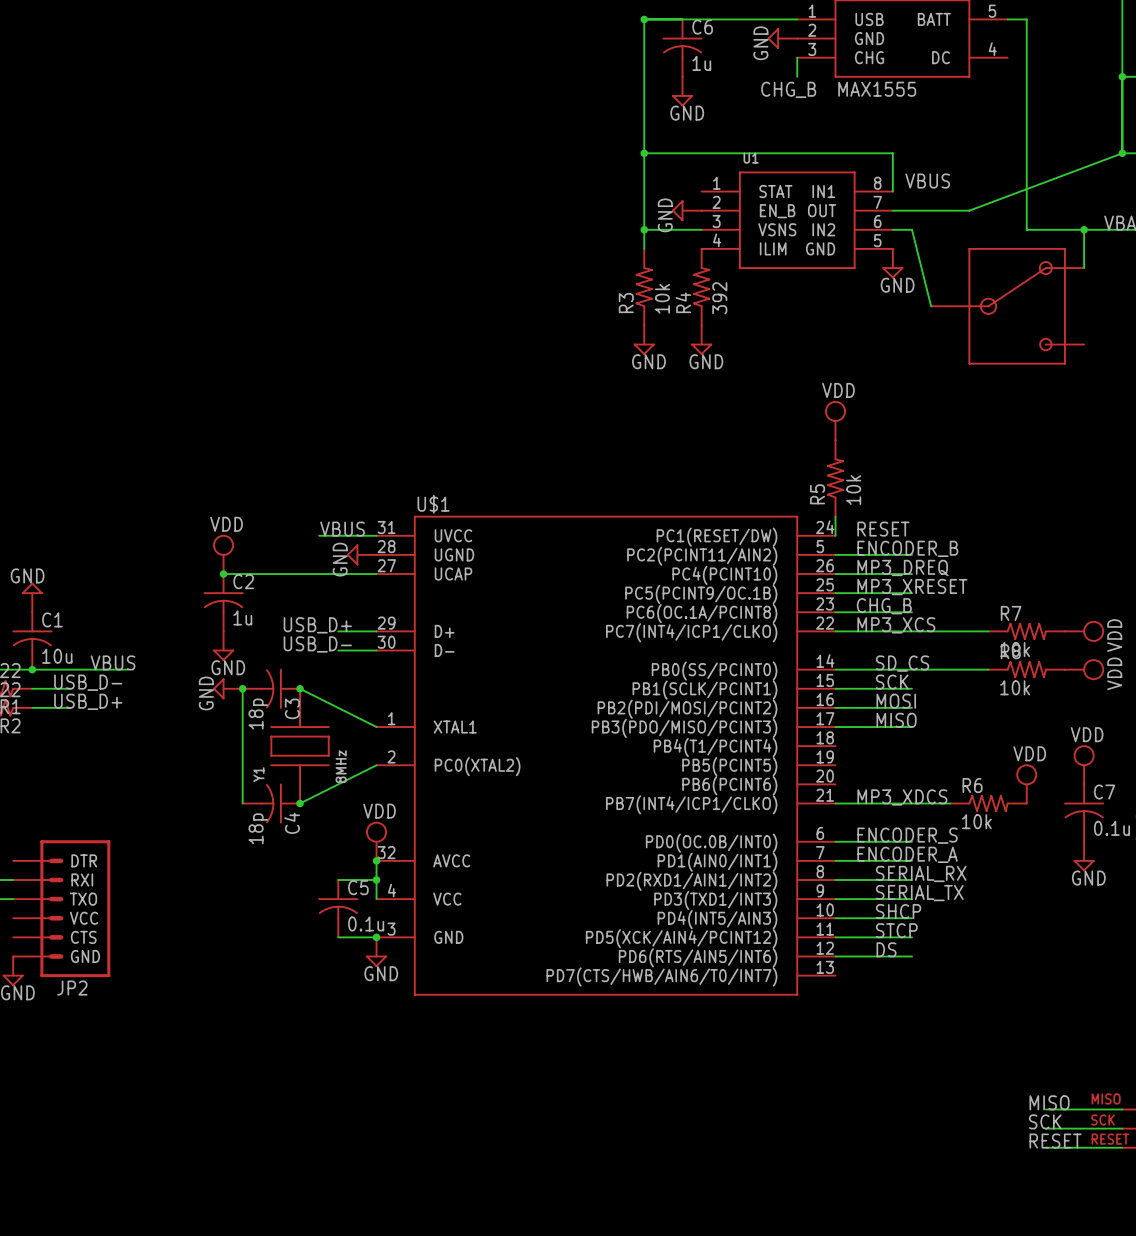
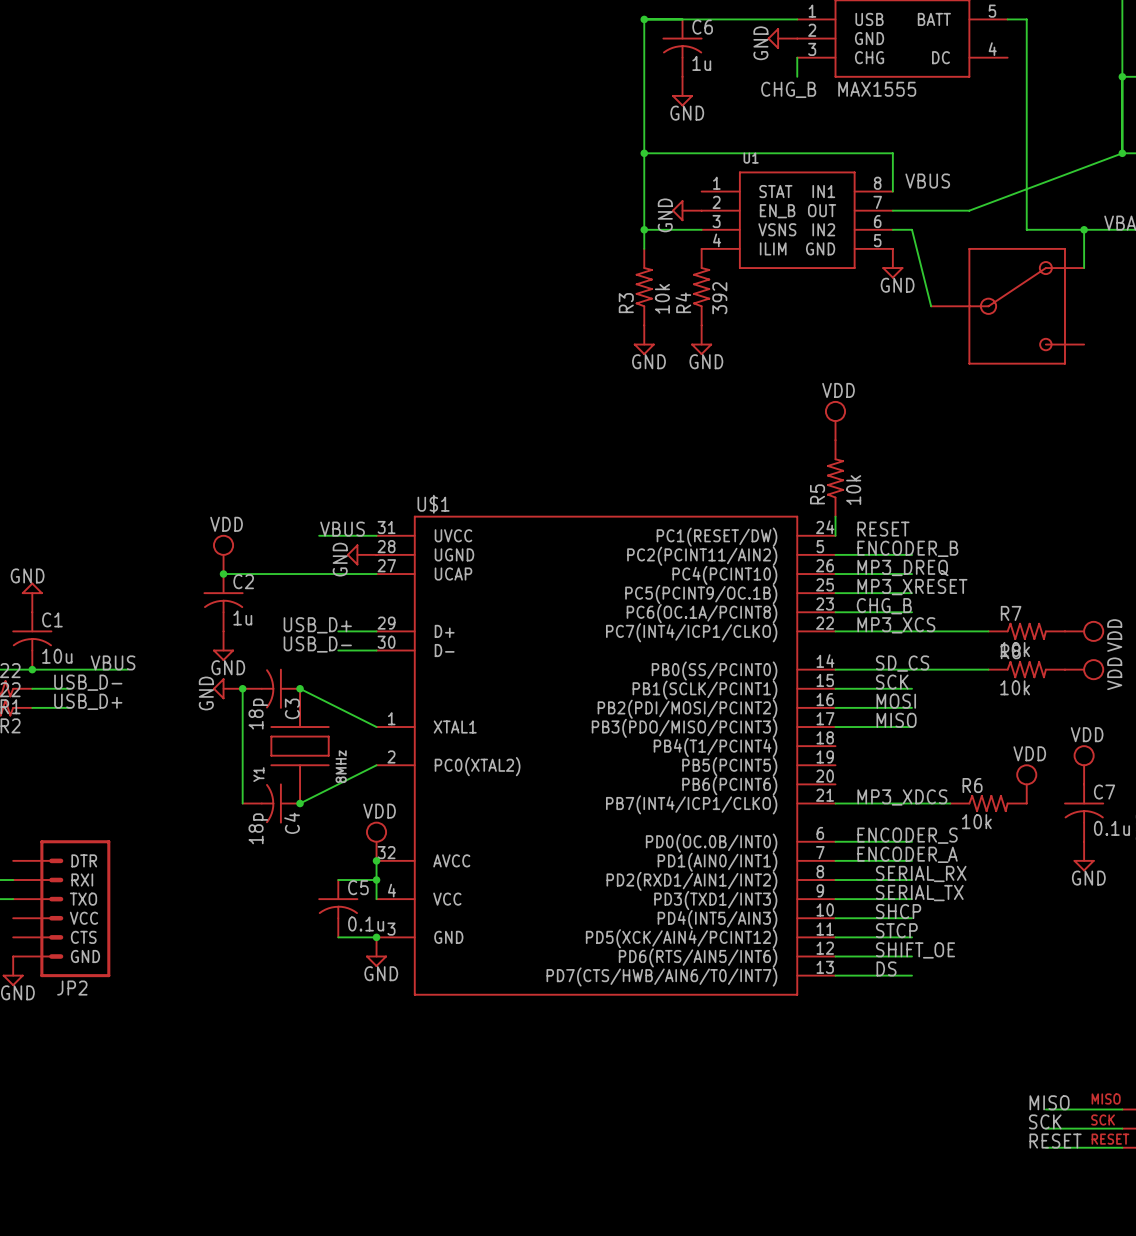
label: DS (886, 949) -> SHIFT_OE (915, 950)
label: none -> DS (886, 968)
wire: none -> (835, 975) (912, 975)

